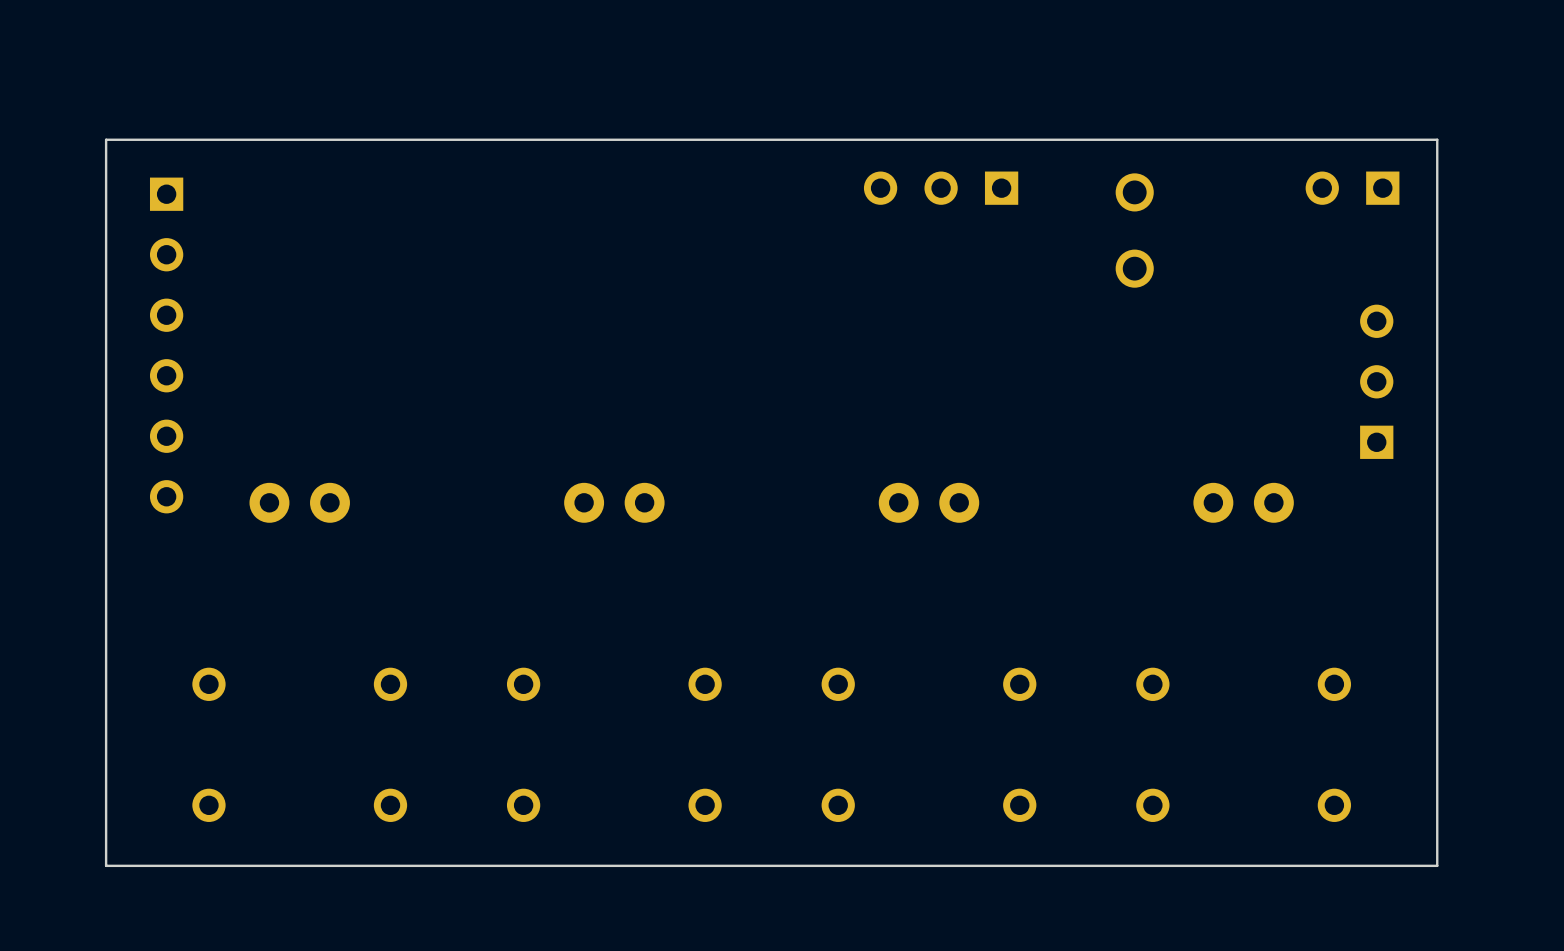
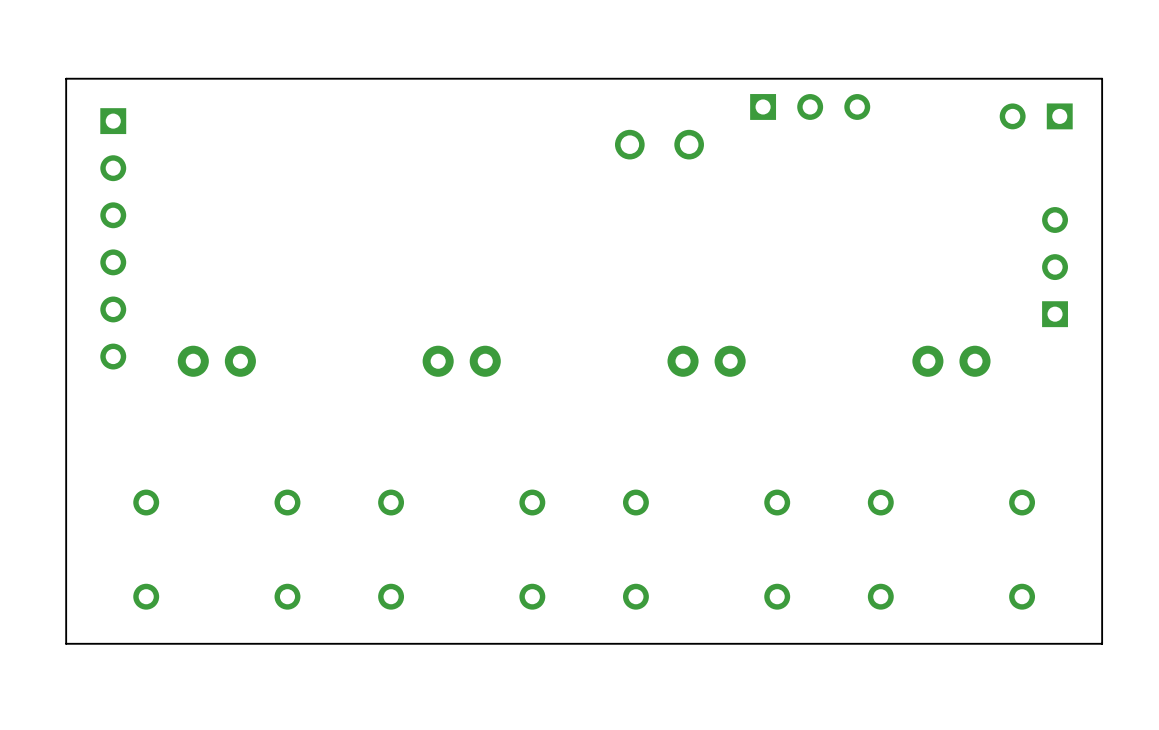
part rotation: 0° (941, 188) -> 180° (810, 106)
part position: (941, 188) -> (810, 106)
part rotation: 0° (1134, 230) -> 90° clockwise (659, 144)
part position: (1134, 230) -> (659, 144)

